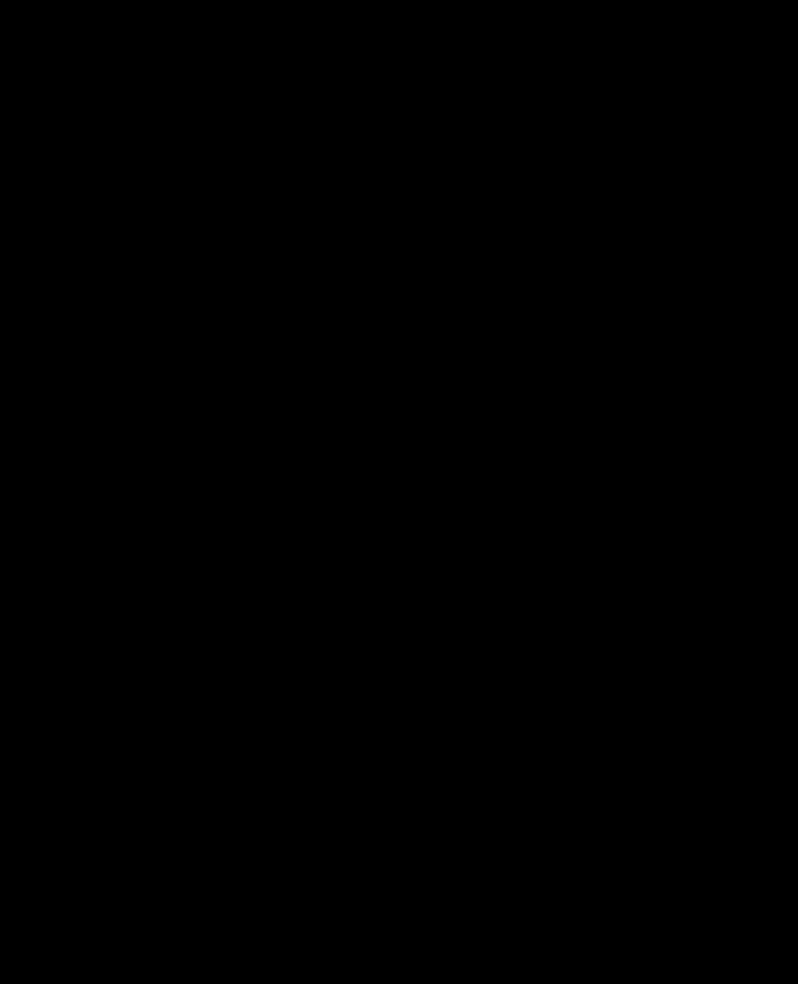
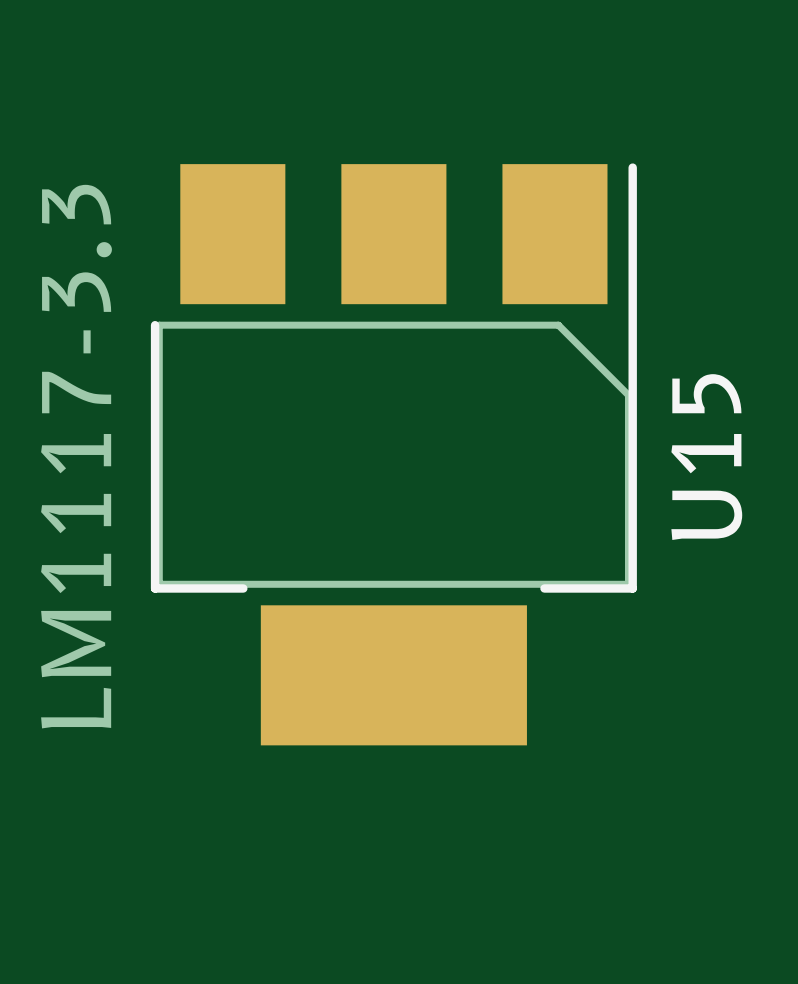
U15: none -> LM1117-3.3 (393, 454)

